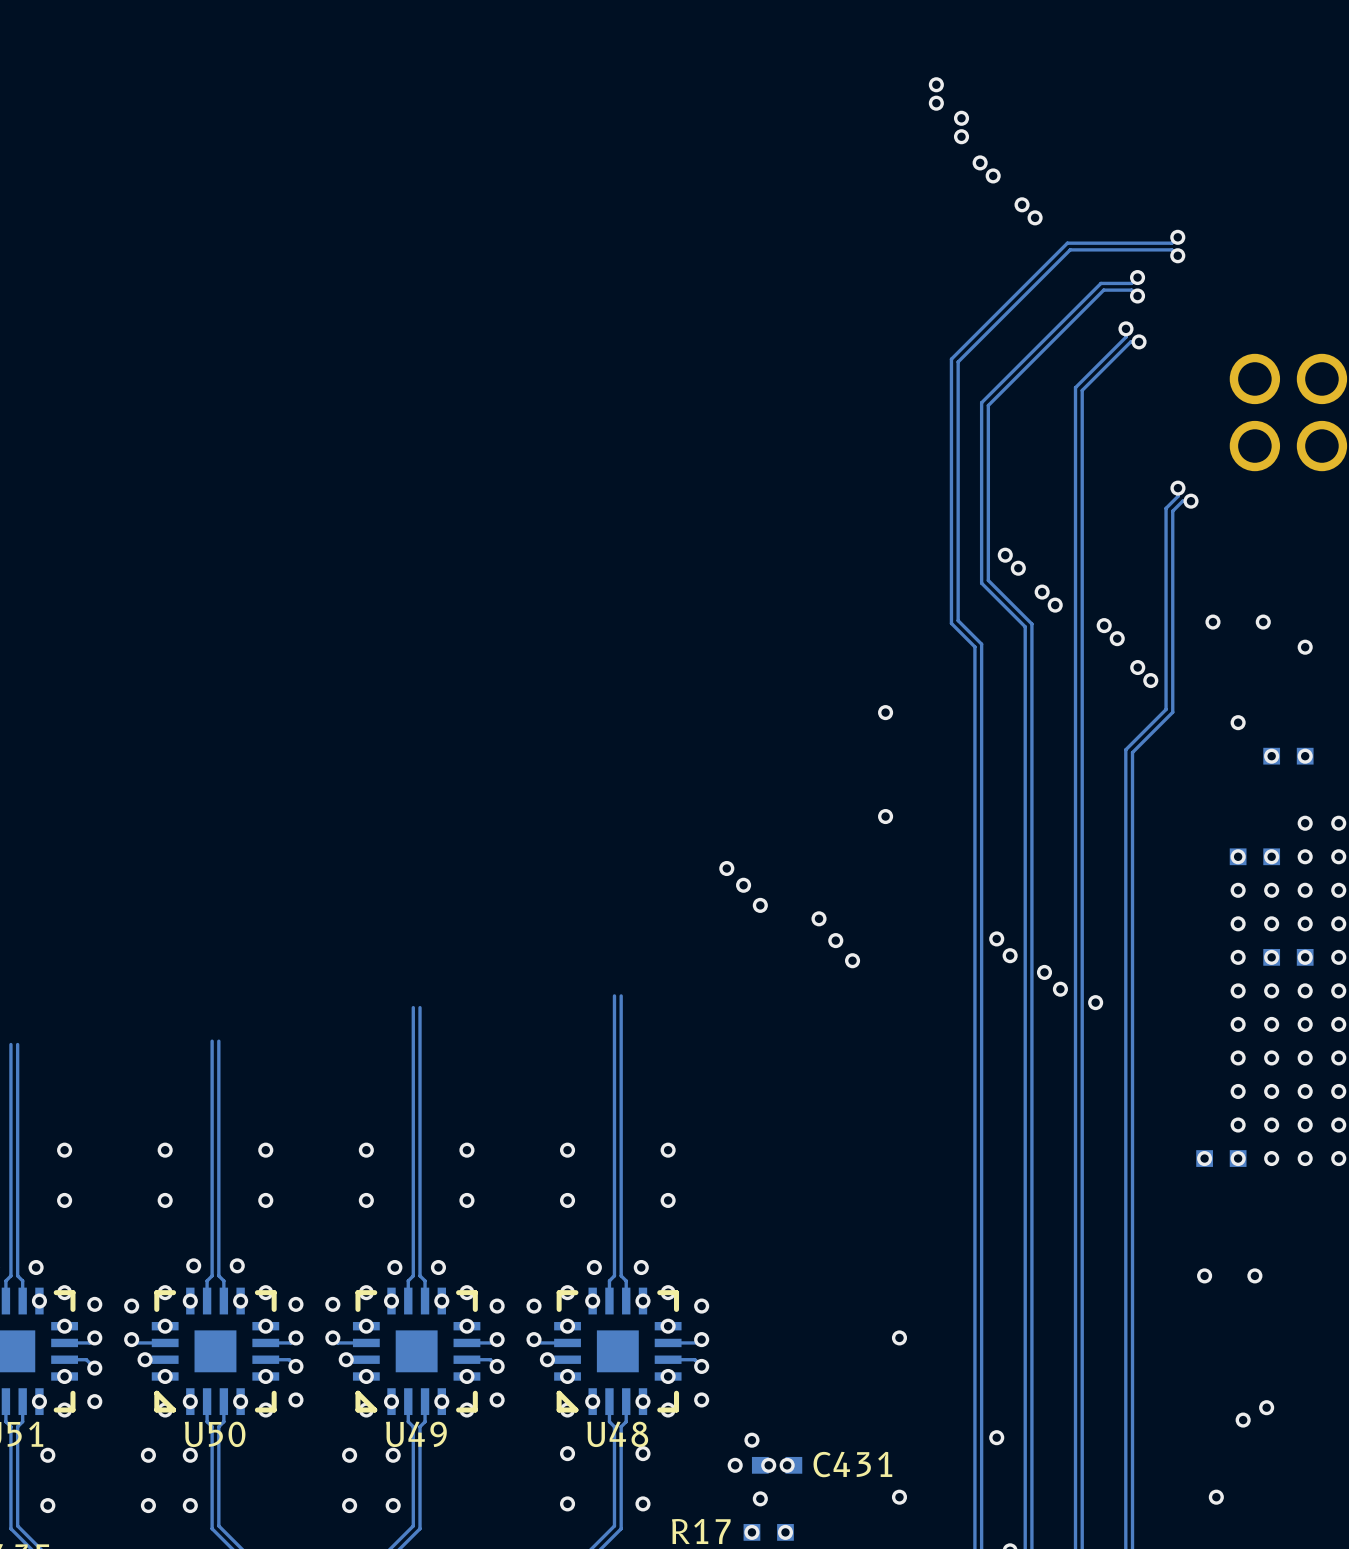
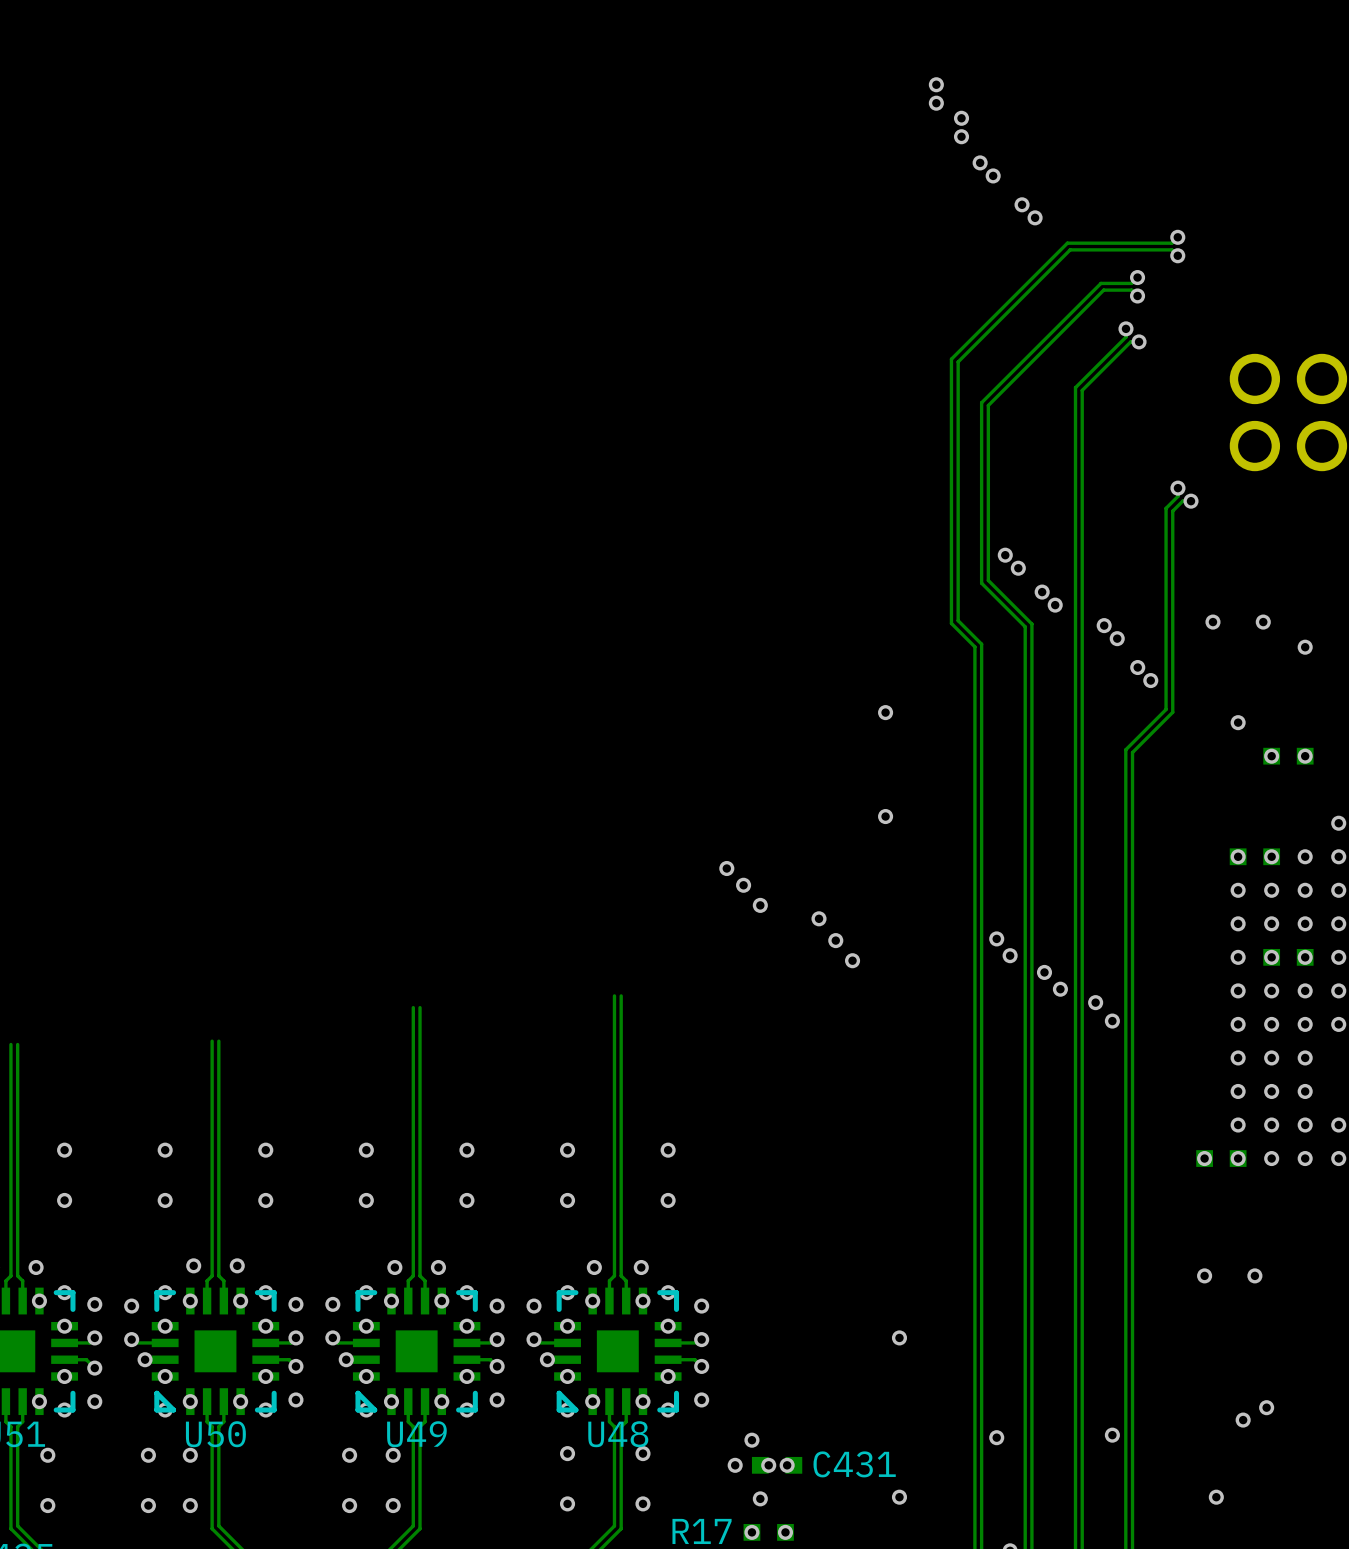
via: (1305, 823) -> none
via: none -> (1112, 1021)
via: (1338, 1057) -> none
via: (1338, 1091) -> none
via: none -> (1112, 1435)

